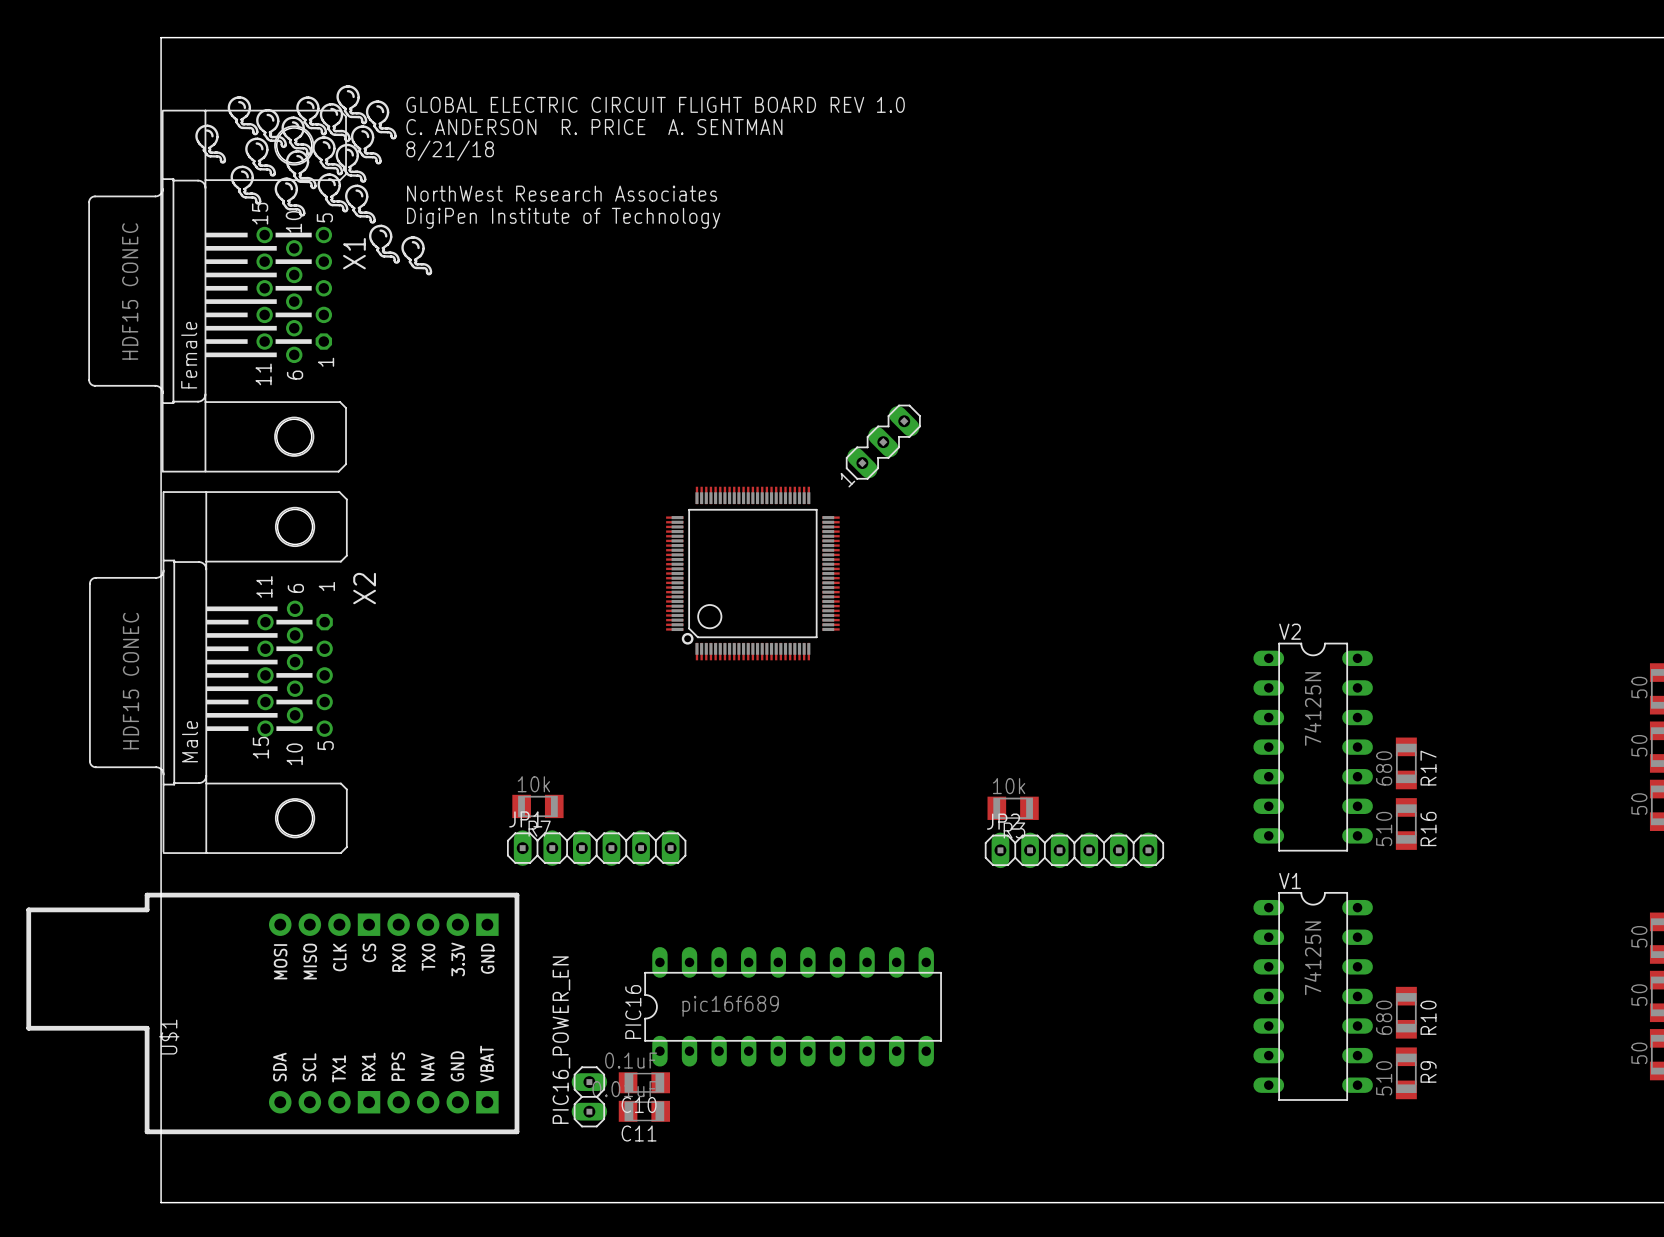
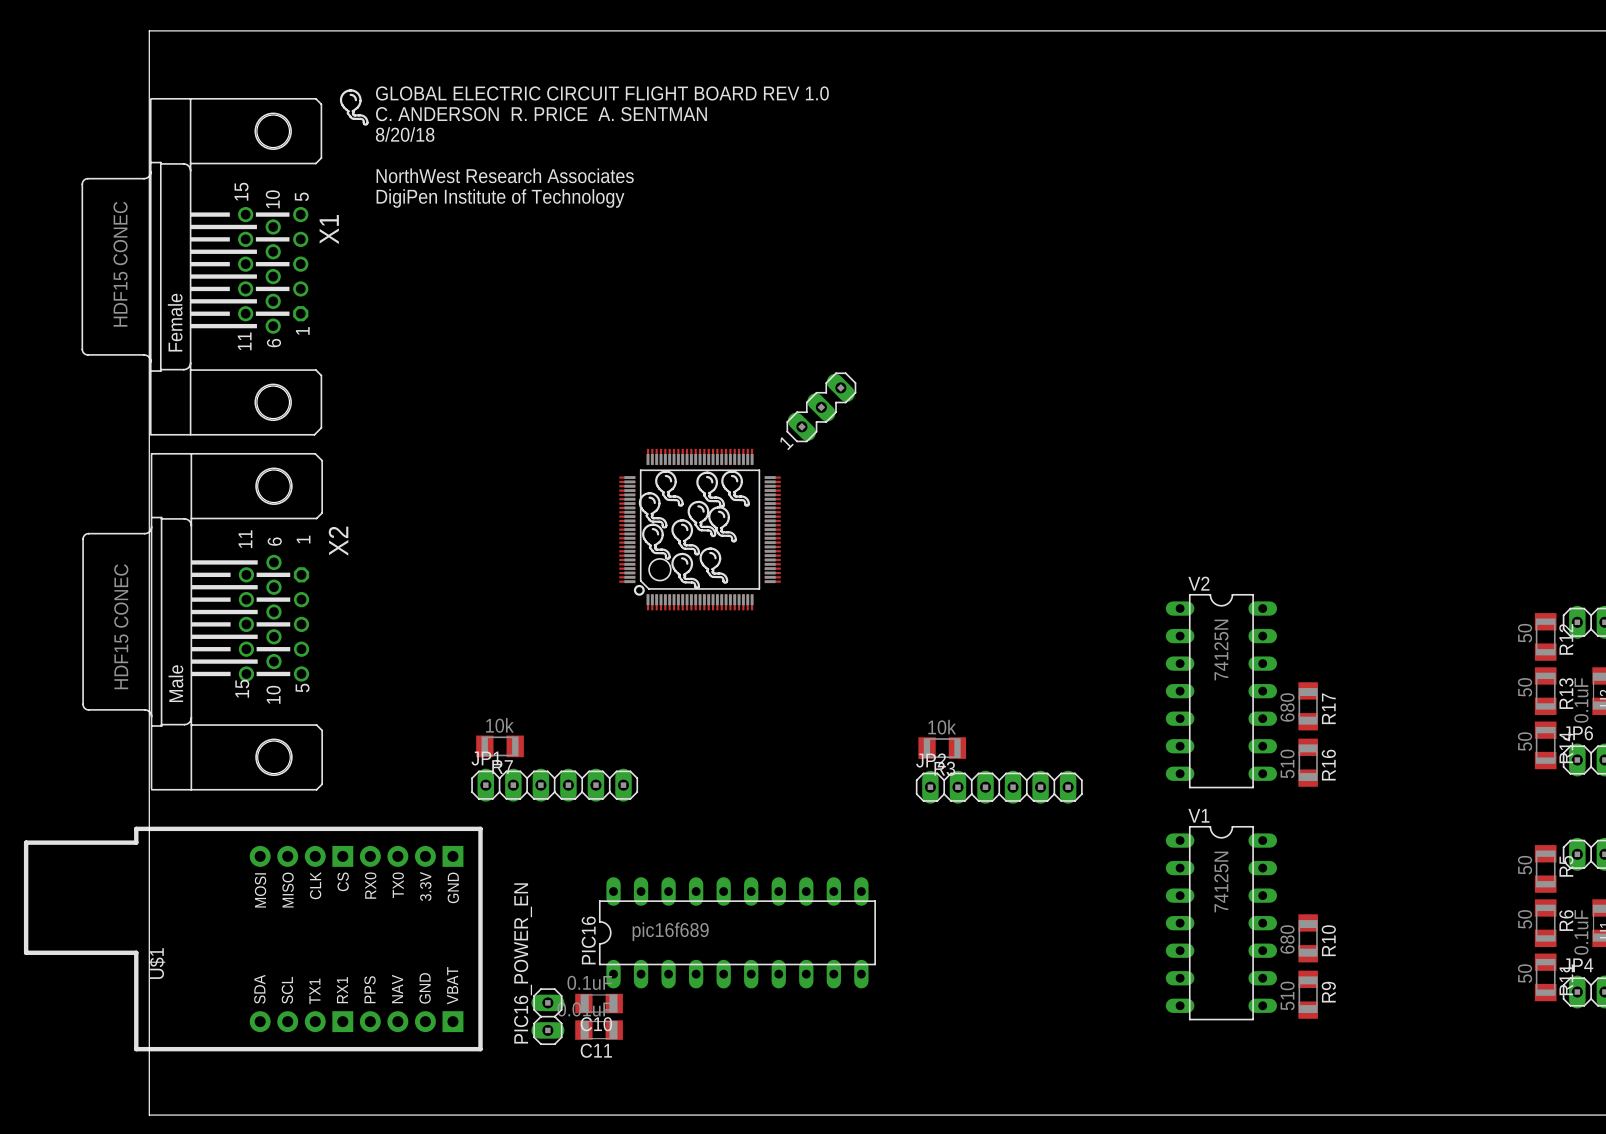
drawing: [195, 85, 433, 276] -> none
text: 8/21/18 (450, 150) -> 8/20/18 (405, 134)
drawing: none -> [638, 470, 750, 590]

